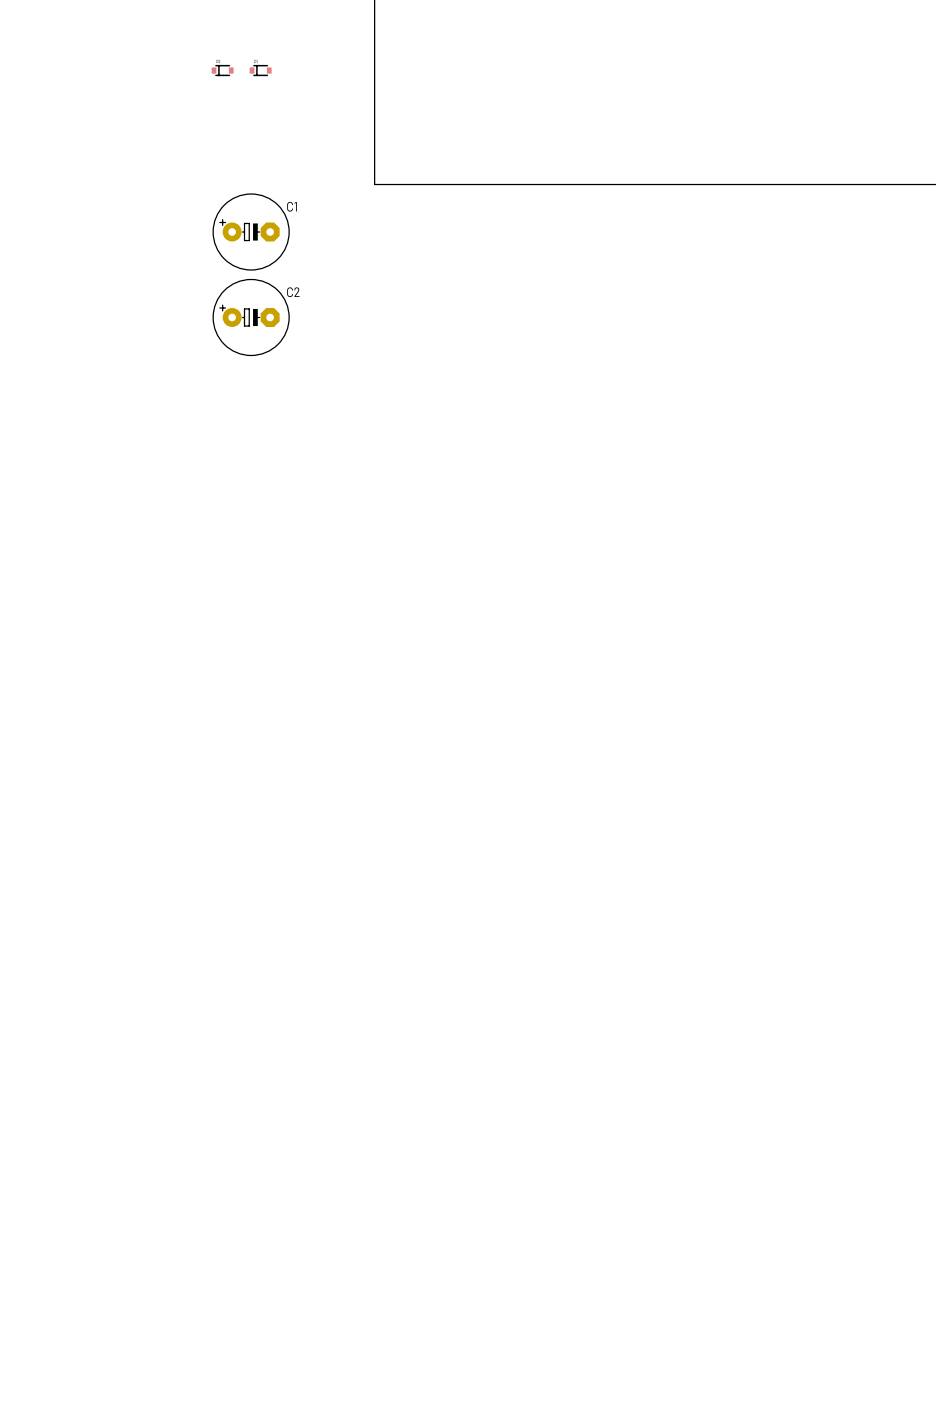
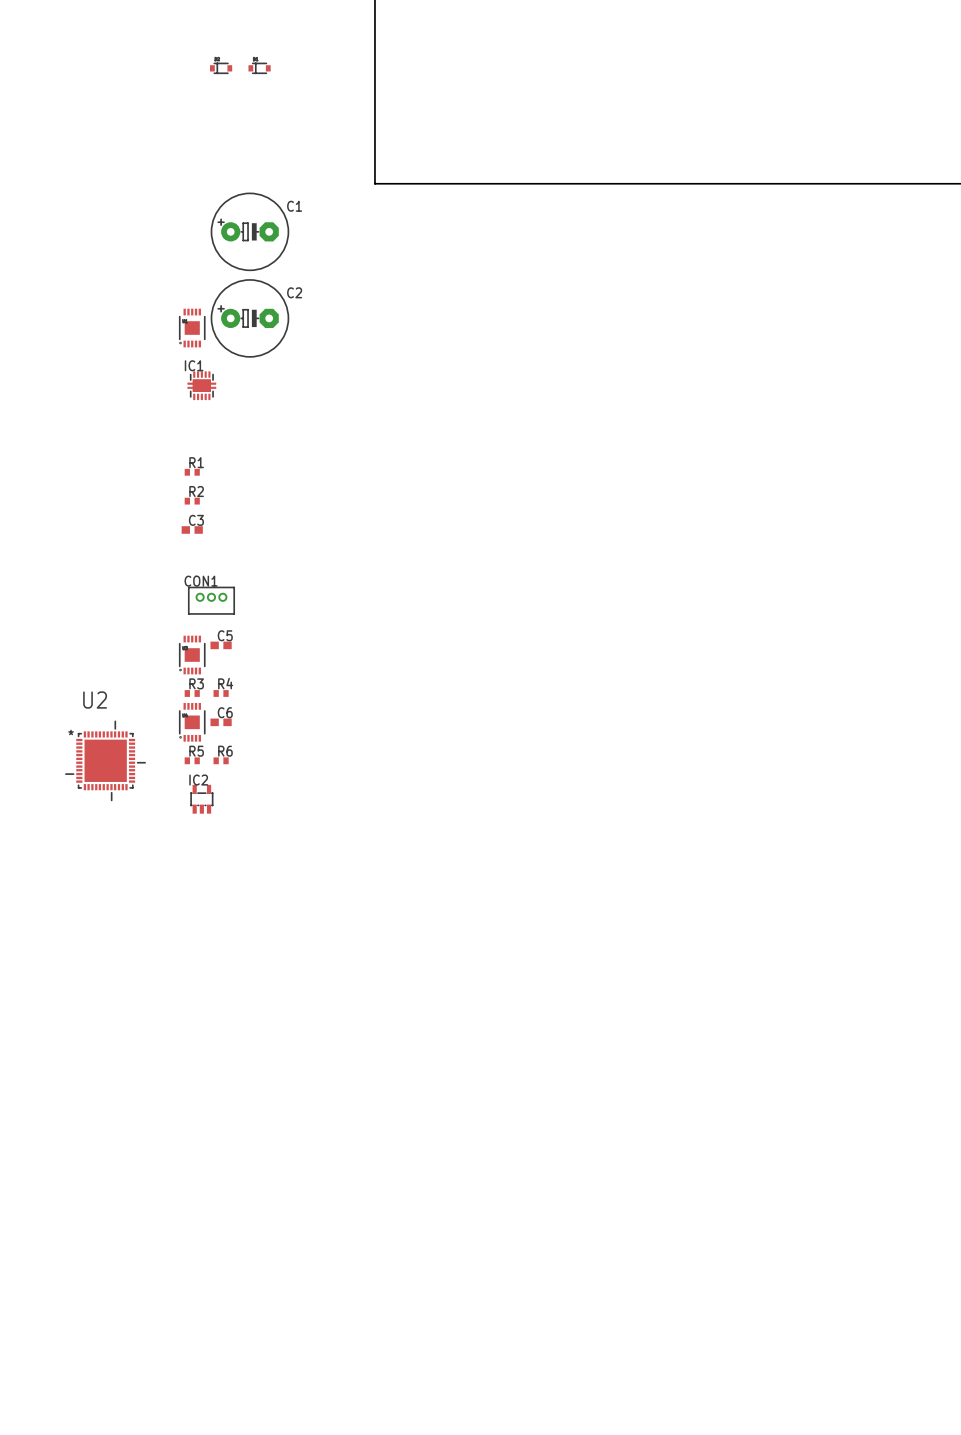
part: none -> (192, 328)
IC1: none -> (201, 385)
R1: none -> (192, 472)
R2: none -> (192, 501)
C3: none -> (192, 529)
CON1: none -> (211, 600)
C5: none -> (221, 645)
part: none -> (192, 655)
R3: none -> (192, 693)
R4: none -> (221, 693)
part: none -> (192, 722)
C6: none -> (221, 722)
U2: none -> (105, 760)
R5: none -> (192, 760)
R6: none -> (221, 760)
IC2: none -> (201, 799)

